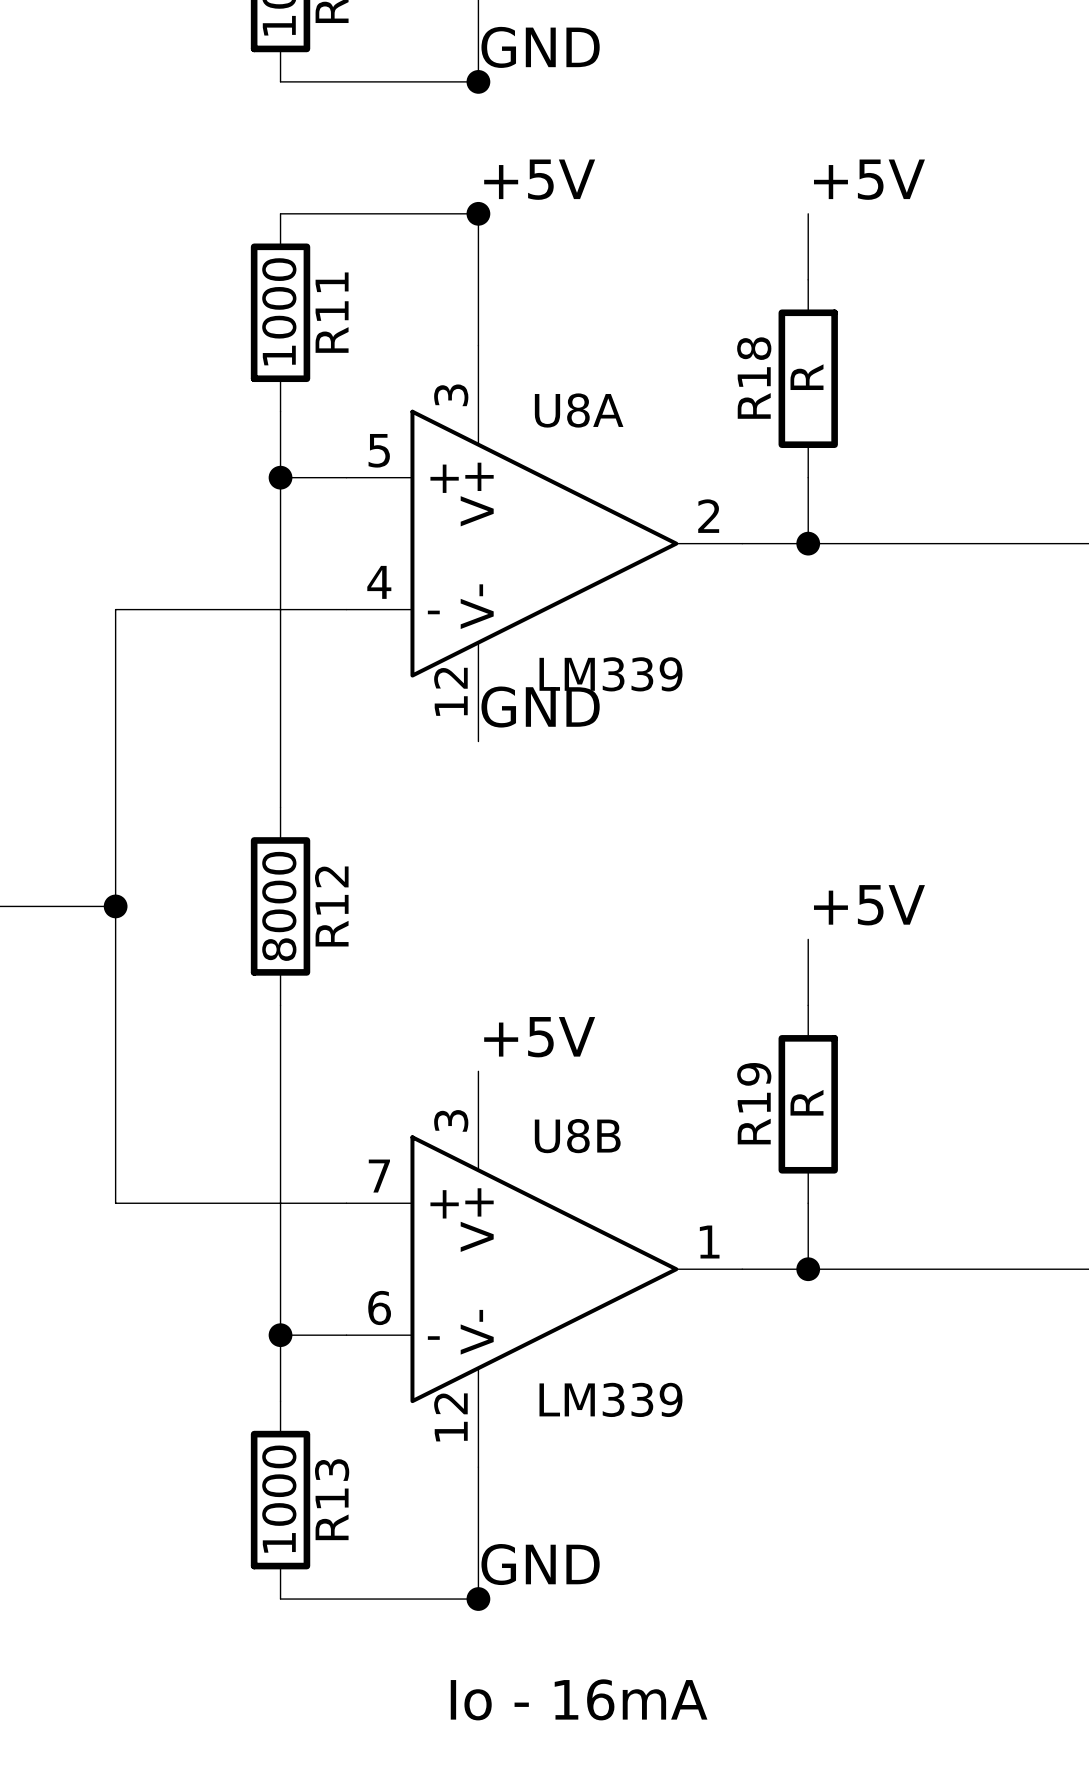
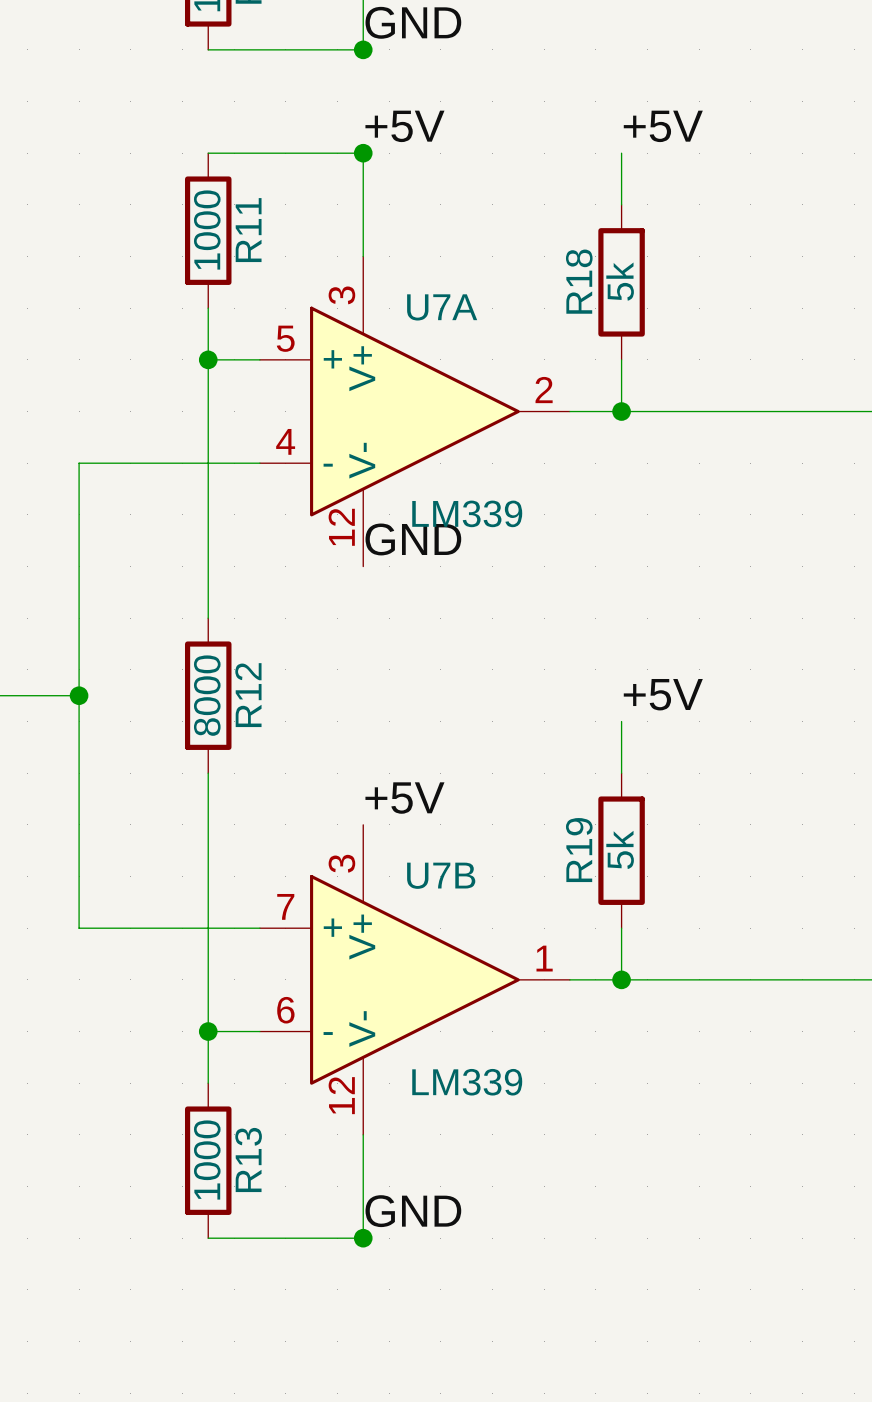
R18 value: R (806, 377) -> 5k (620, 281)
U8A name: U8A (579, 410) -> U7A (442, 307)
R19 value: R (806, 1102) -> 5k (620, 849)
U8B name: U8B (577, 1136) -> U7B (441, 875)
text: Io - 16mA (579, 1699) -> none

